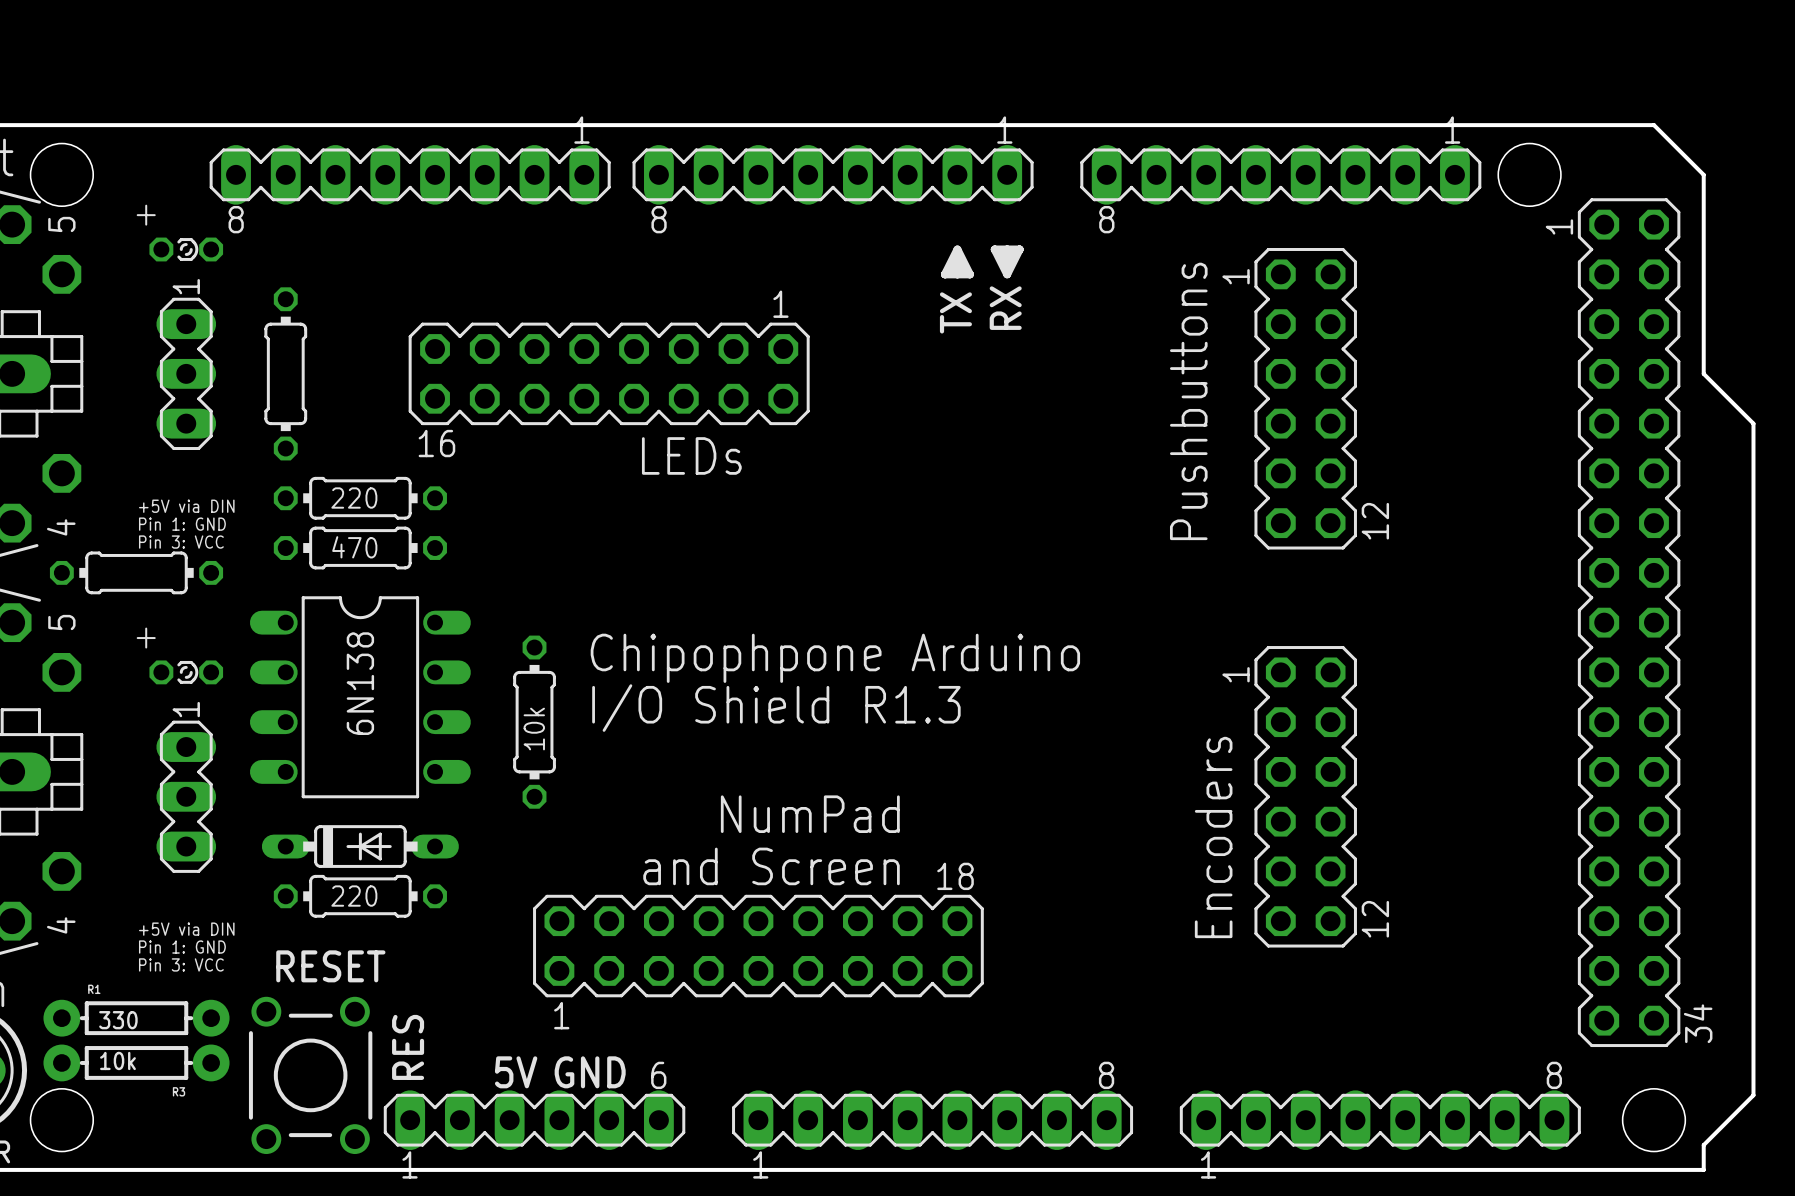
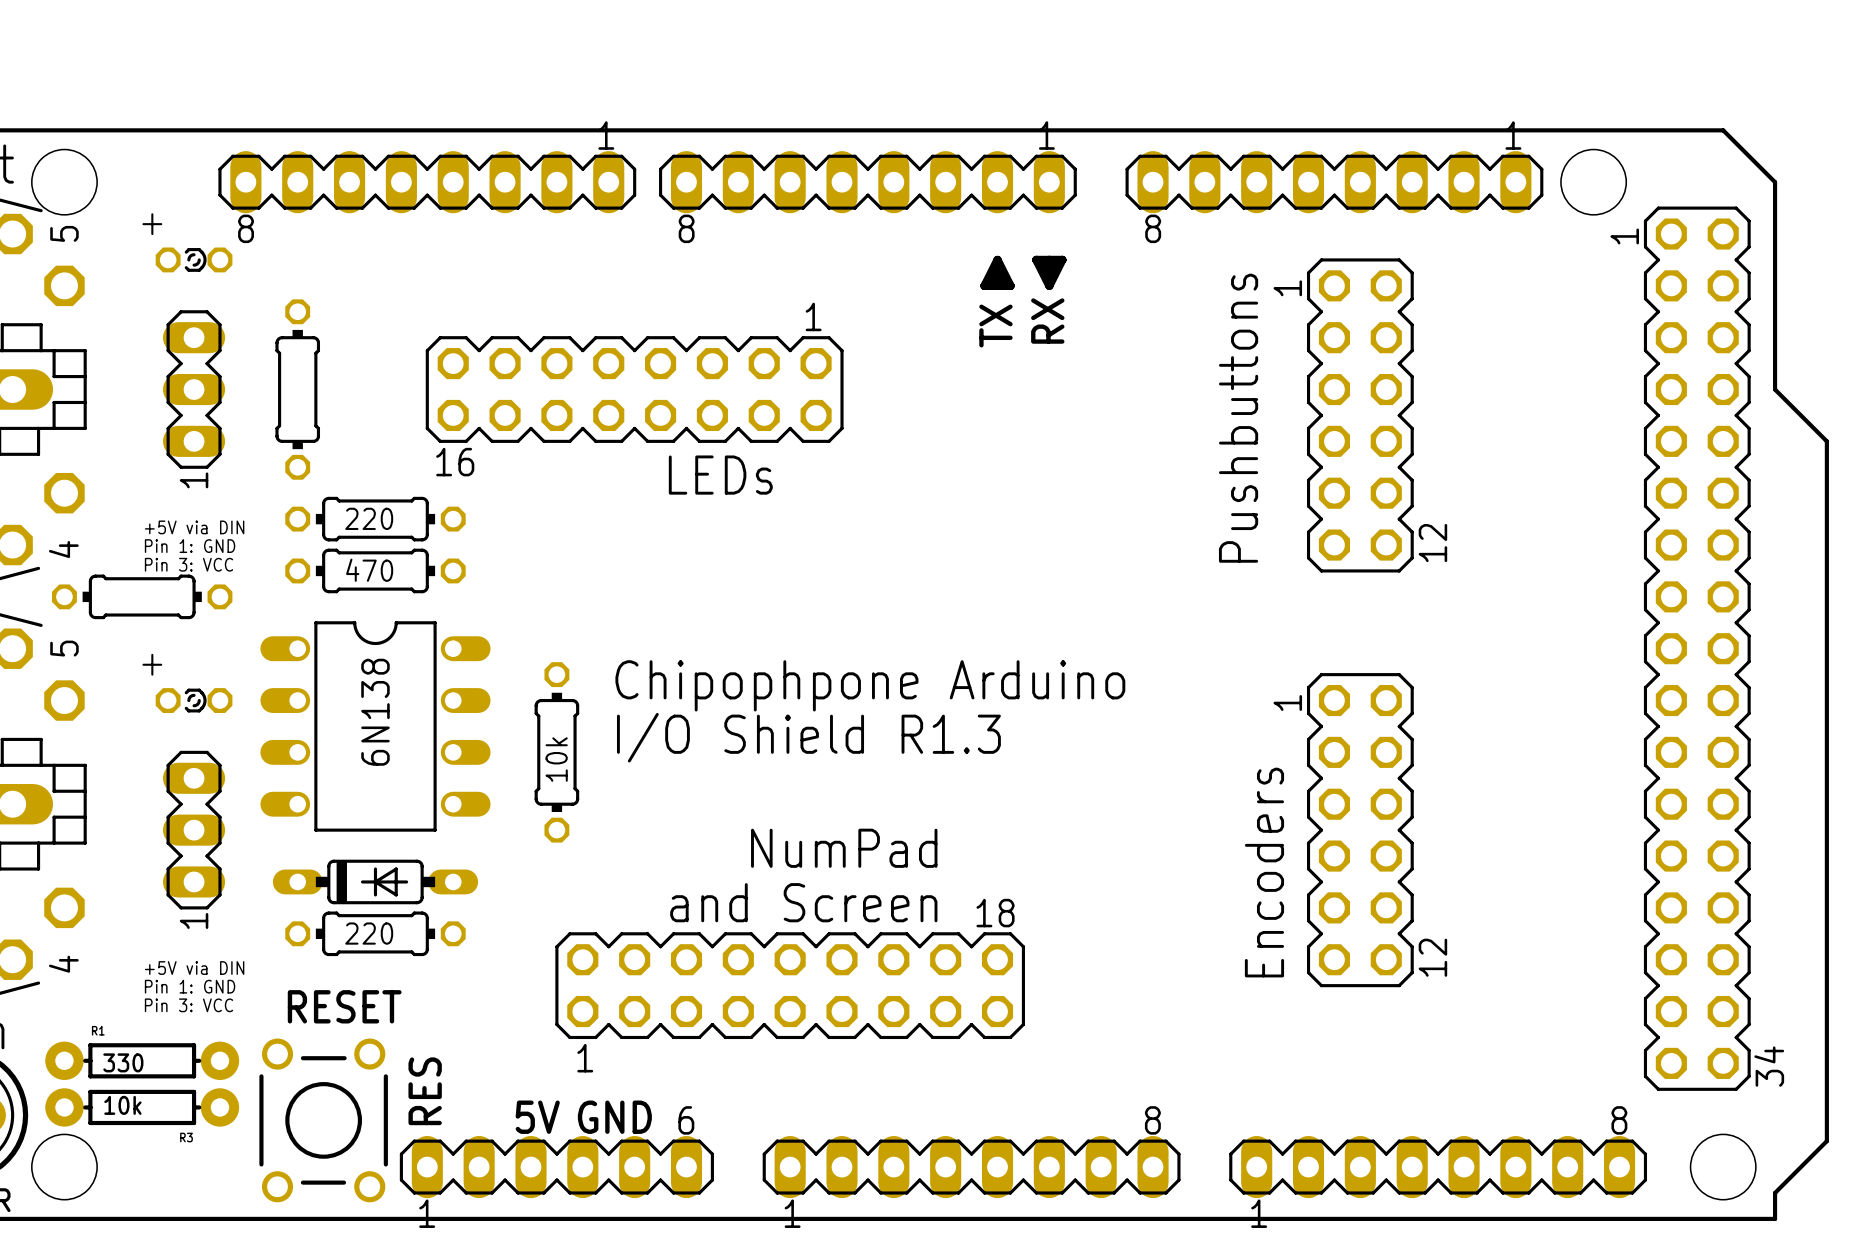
part text position: 1 (186, 286) -> 1 (194, 480)
part text position: 1 (186, 709) -> 1 (194, 920)

